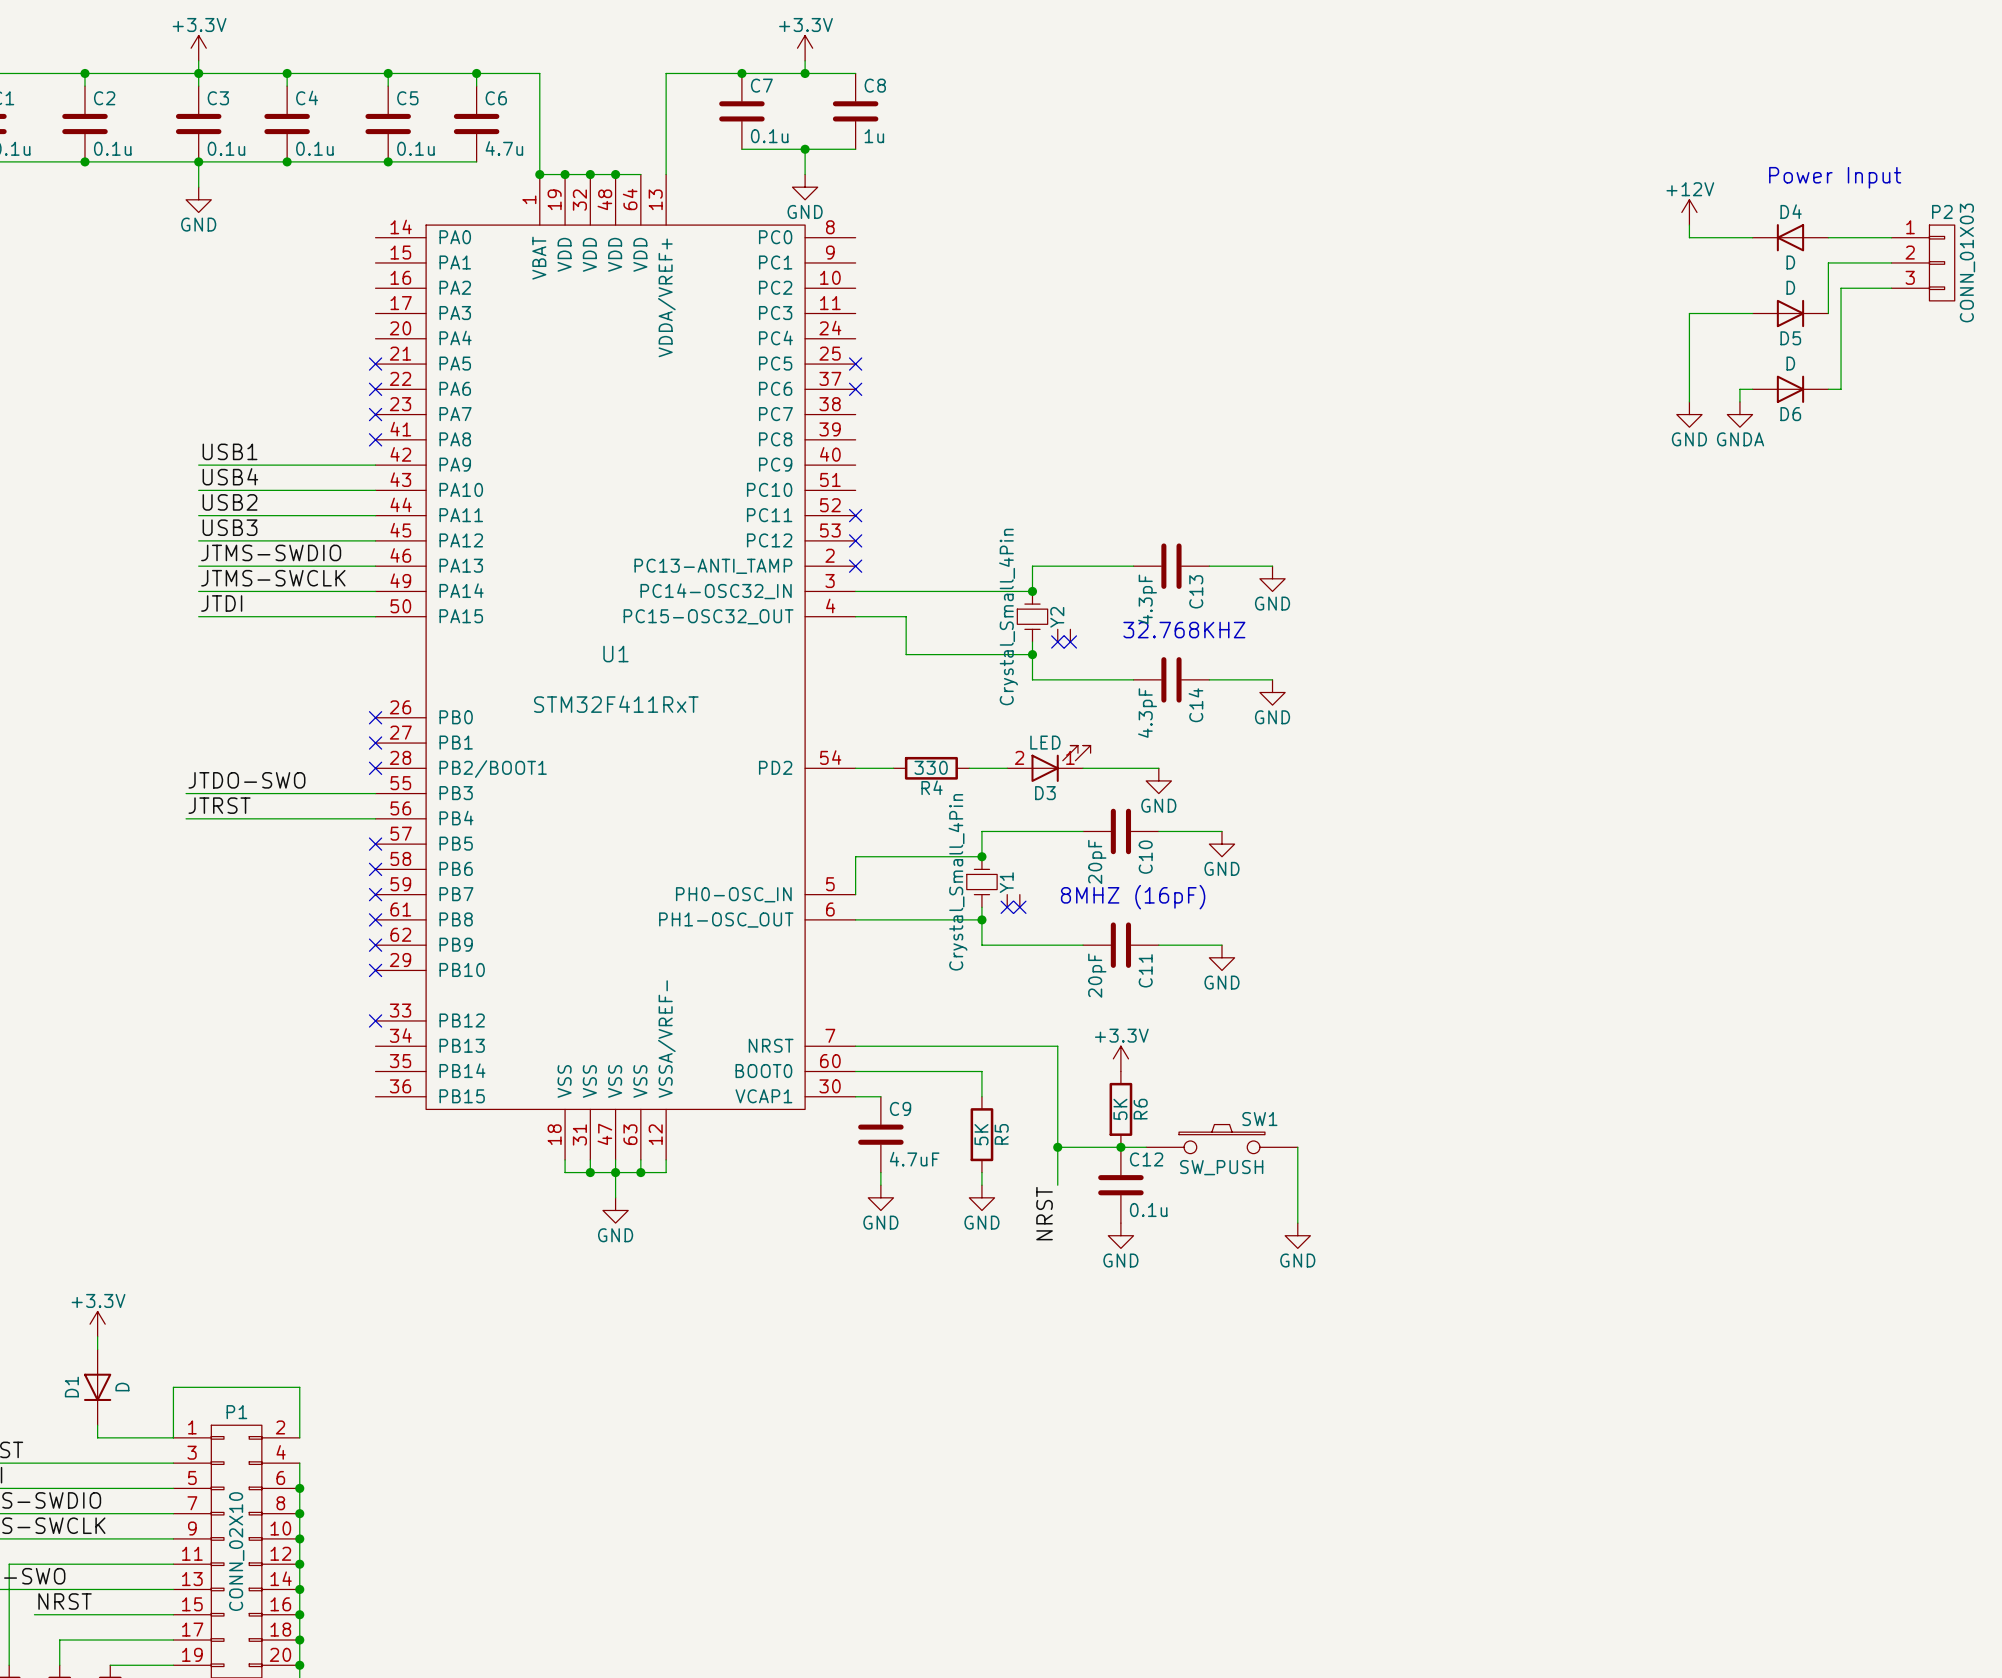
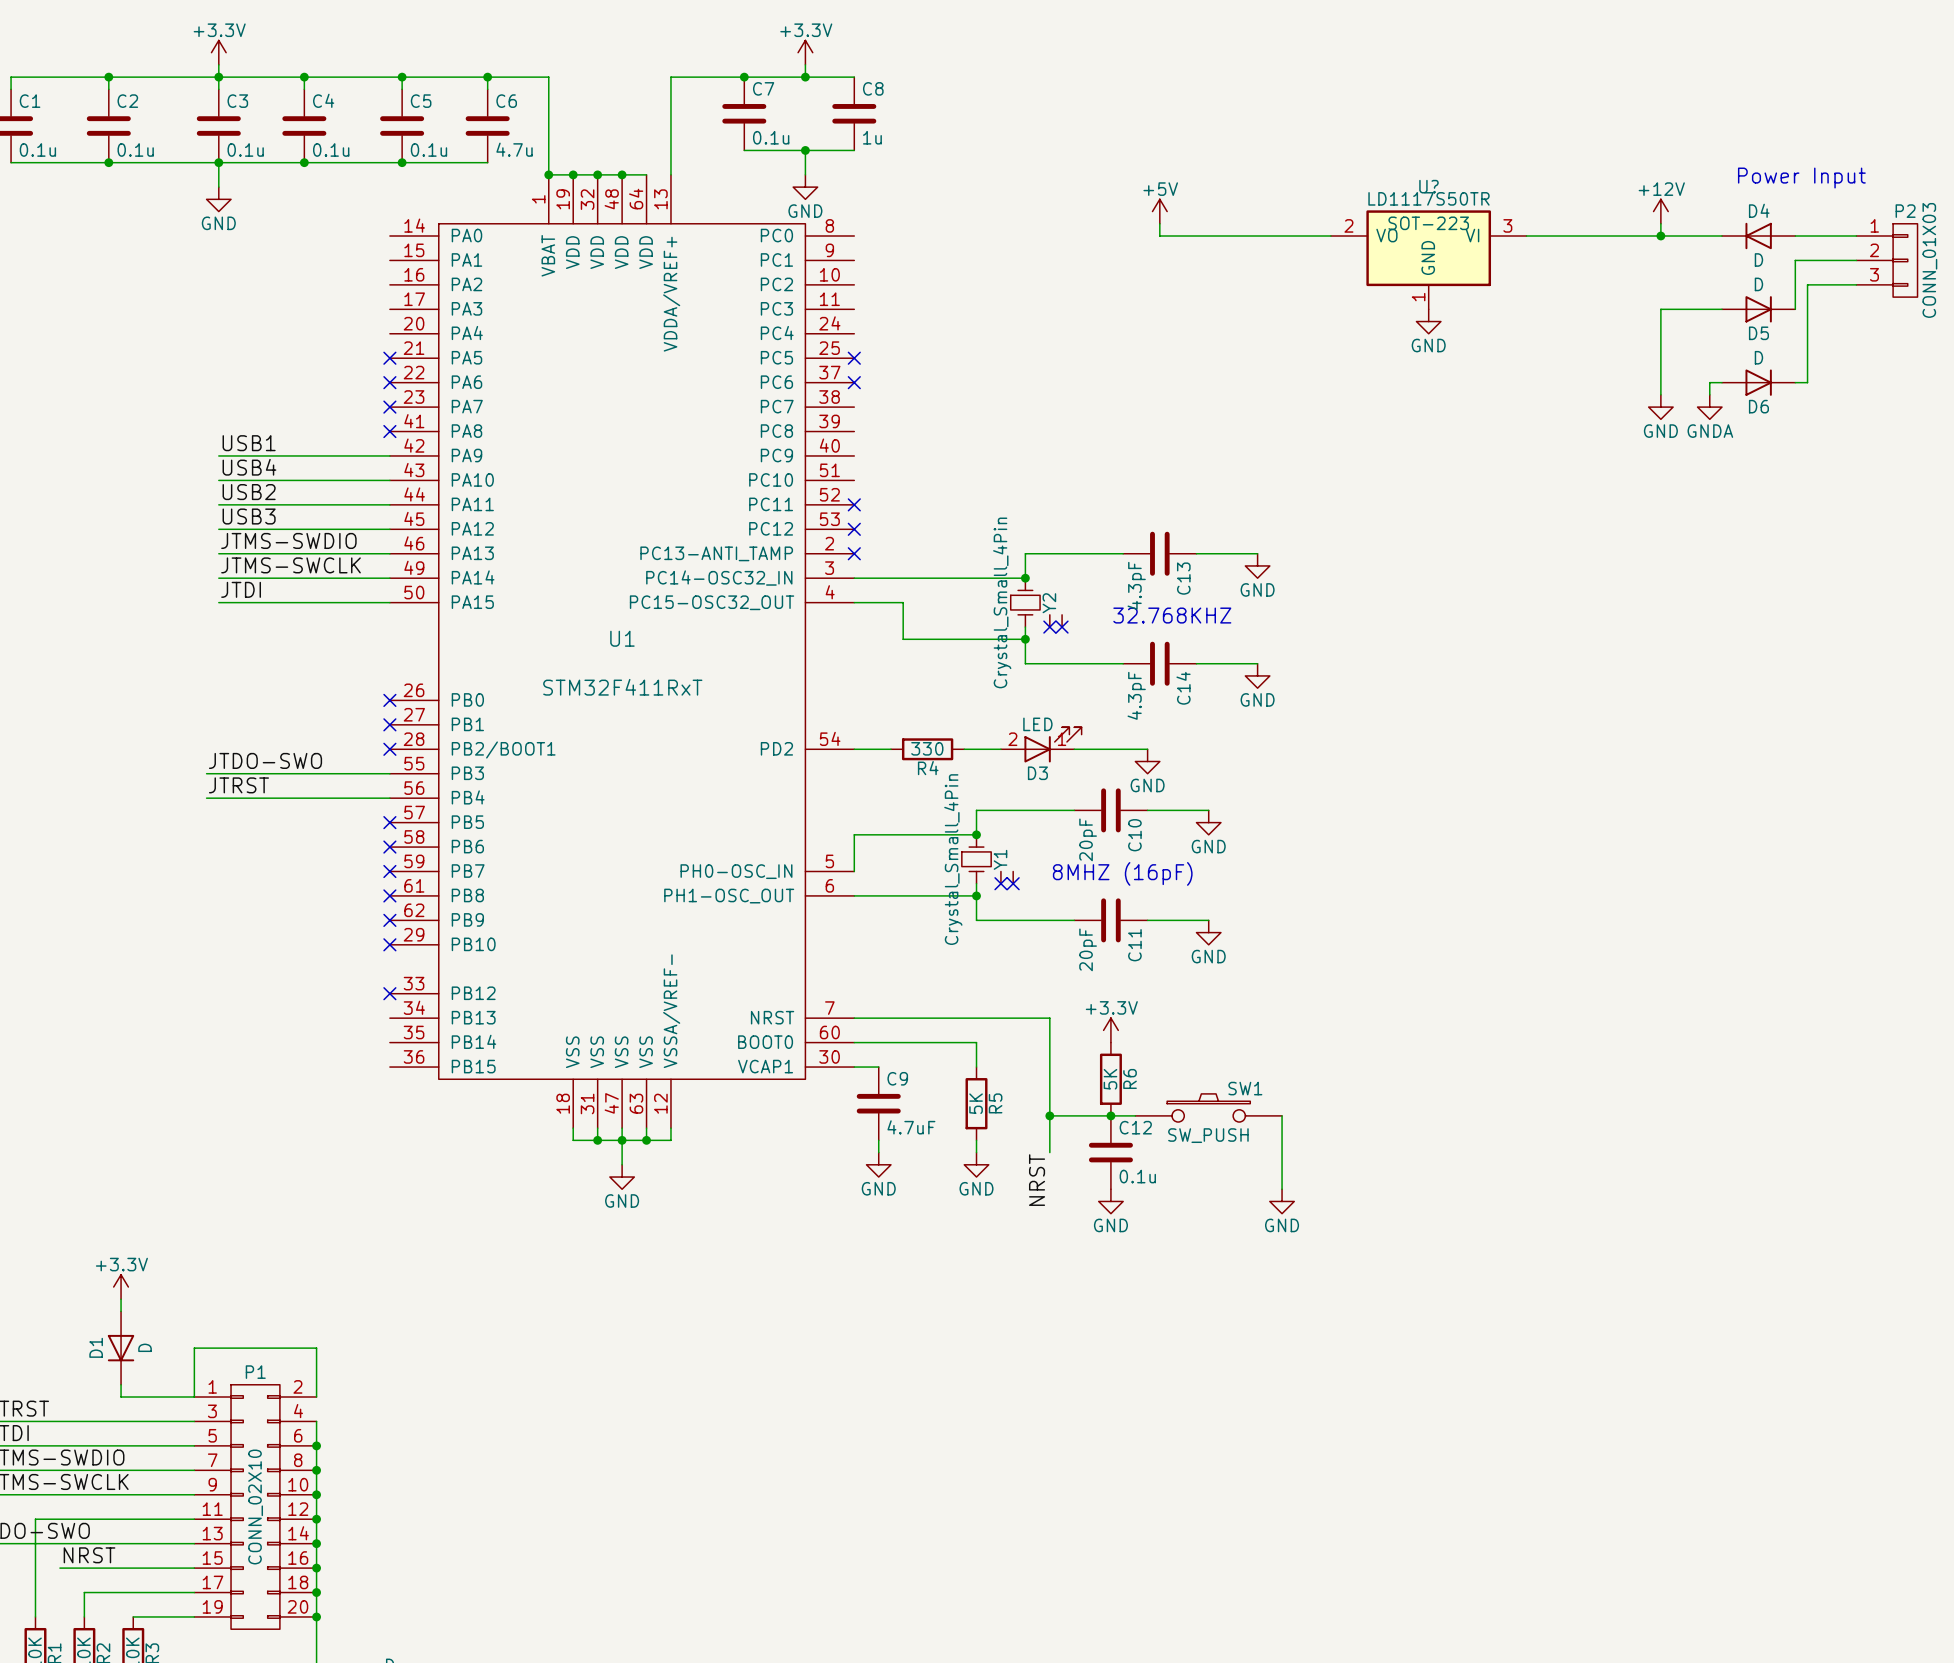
power symbol: none -> +5V (1159, 211)
wire: none -> (1159, 223) (1159, 236) (1330, 236)
wire: none -> (1526, 236) (1660, 236)
junction: none -> (1660, 236)
U?: none -> LD1117S50TR (1428, 259)
power symbol: none -> GND (1428, 321)

